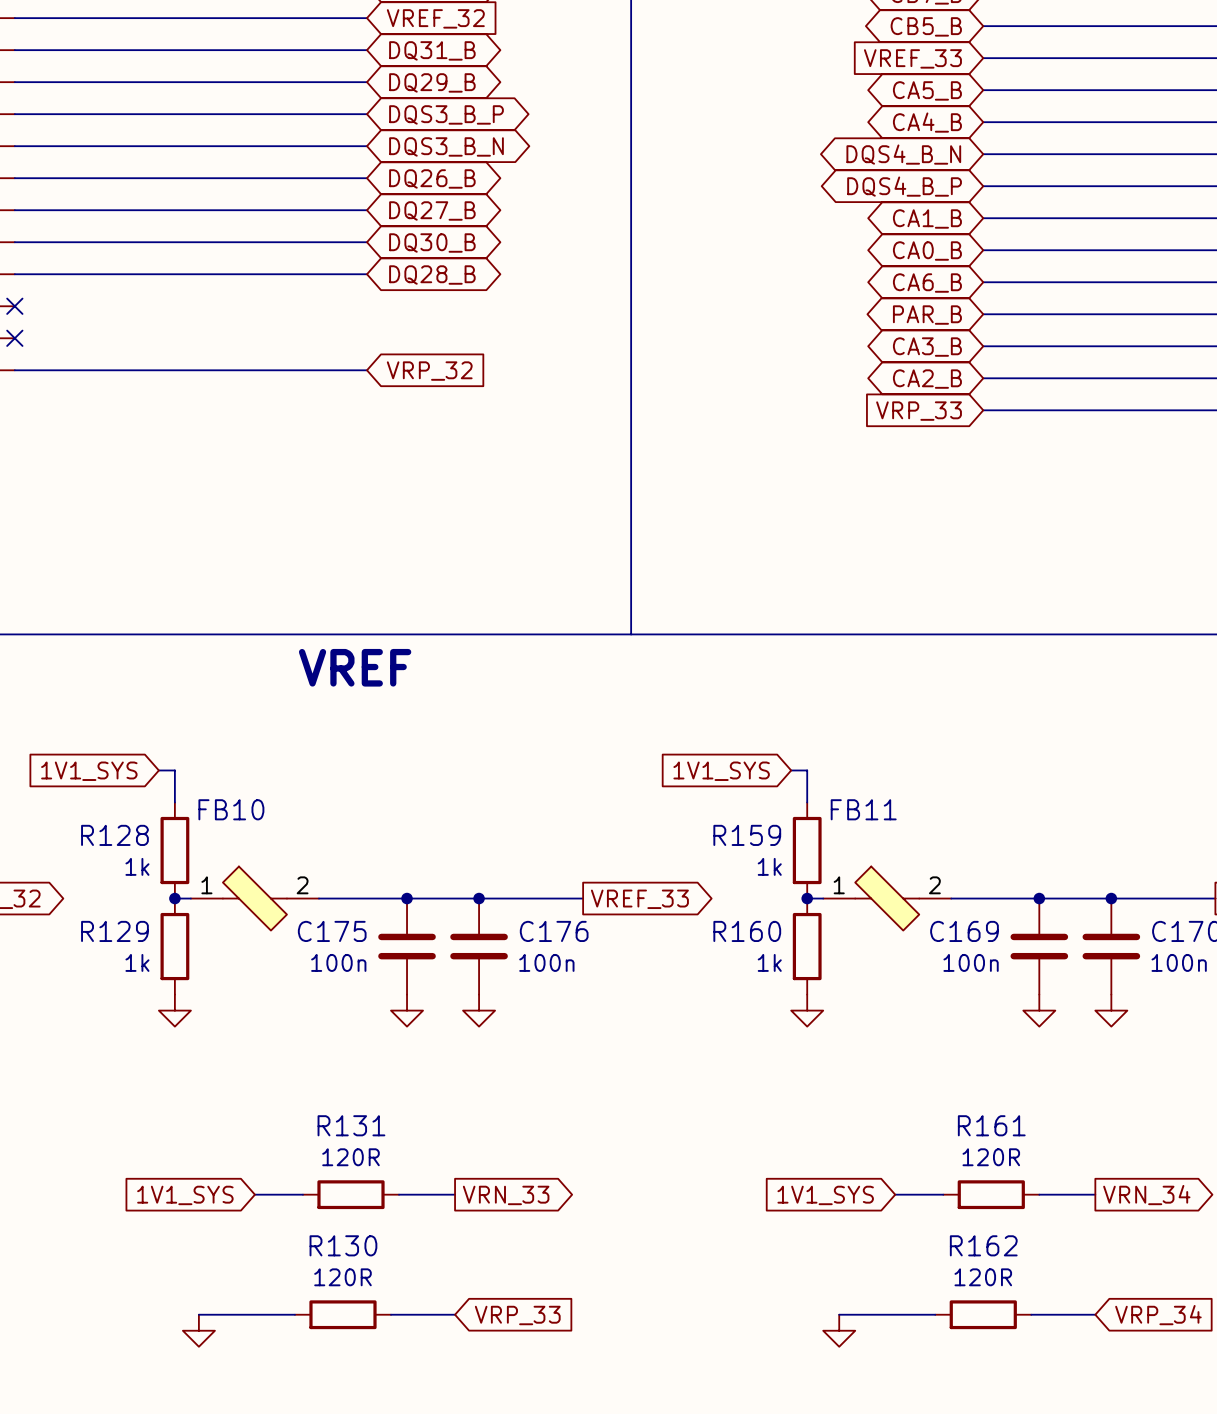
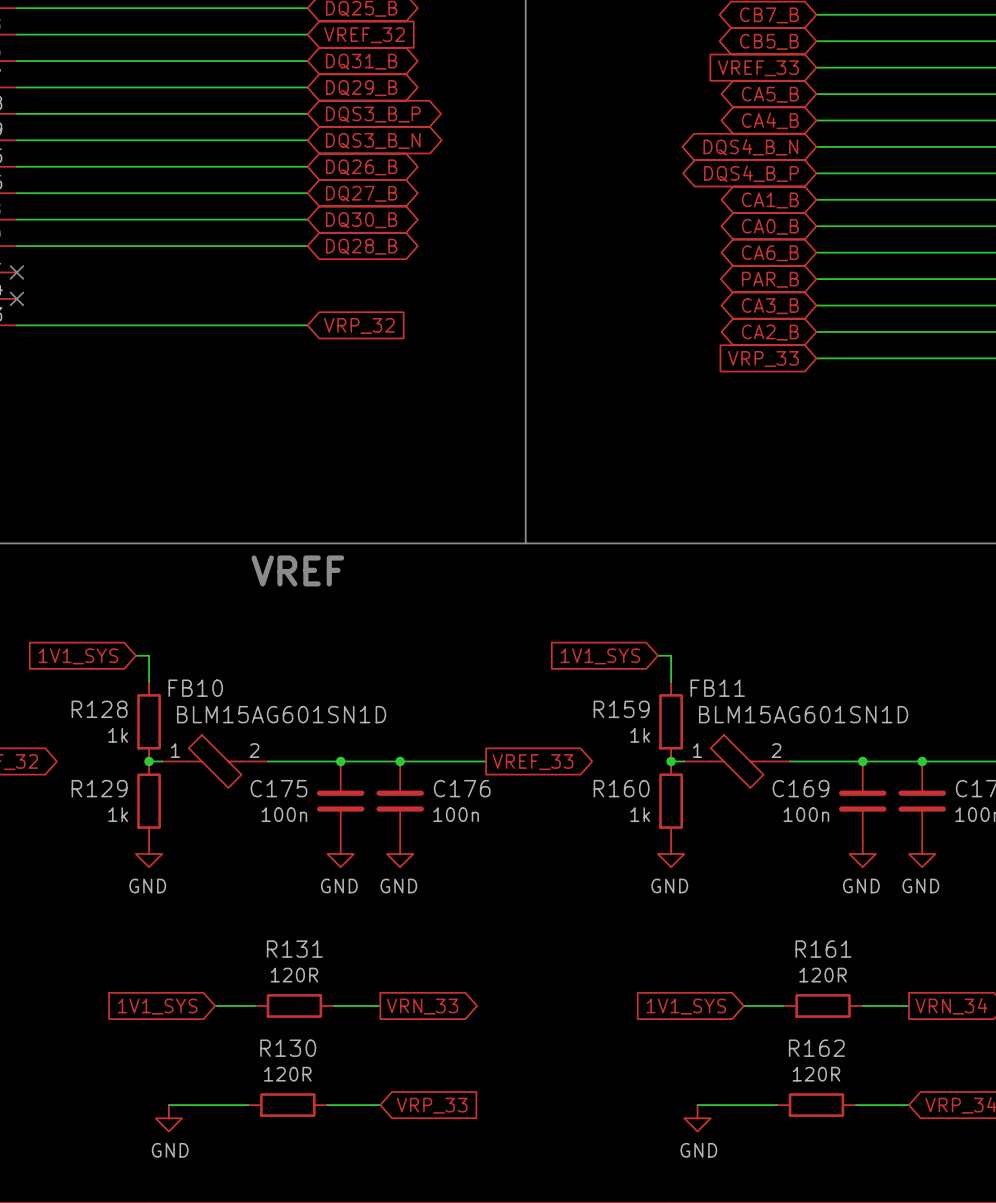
FB10 value: none -> BLM15AG601SN1D (281, 714)
FB11 value: none -> BLM15AG601SN1D (803, 714)
power symbol text: none -> GND (147, 886)
power symbol text: none -> GND (339, 886)
power symbol text: none -> GND (398, 886)
power symbol text: none -> GND (669, 886)
power symbol text: none -> GND (861, 886)
power symbol text: none -> GND (920, 886)
power symbol text: none -> GND (170, 1150)
power symbol text: none -> GND (698, 1150)

